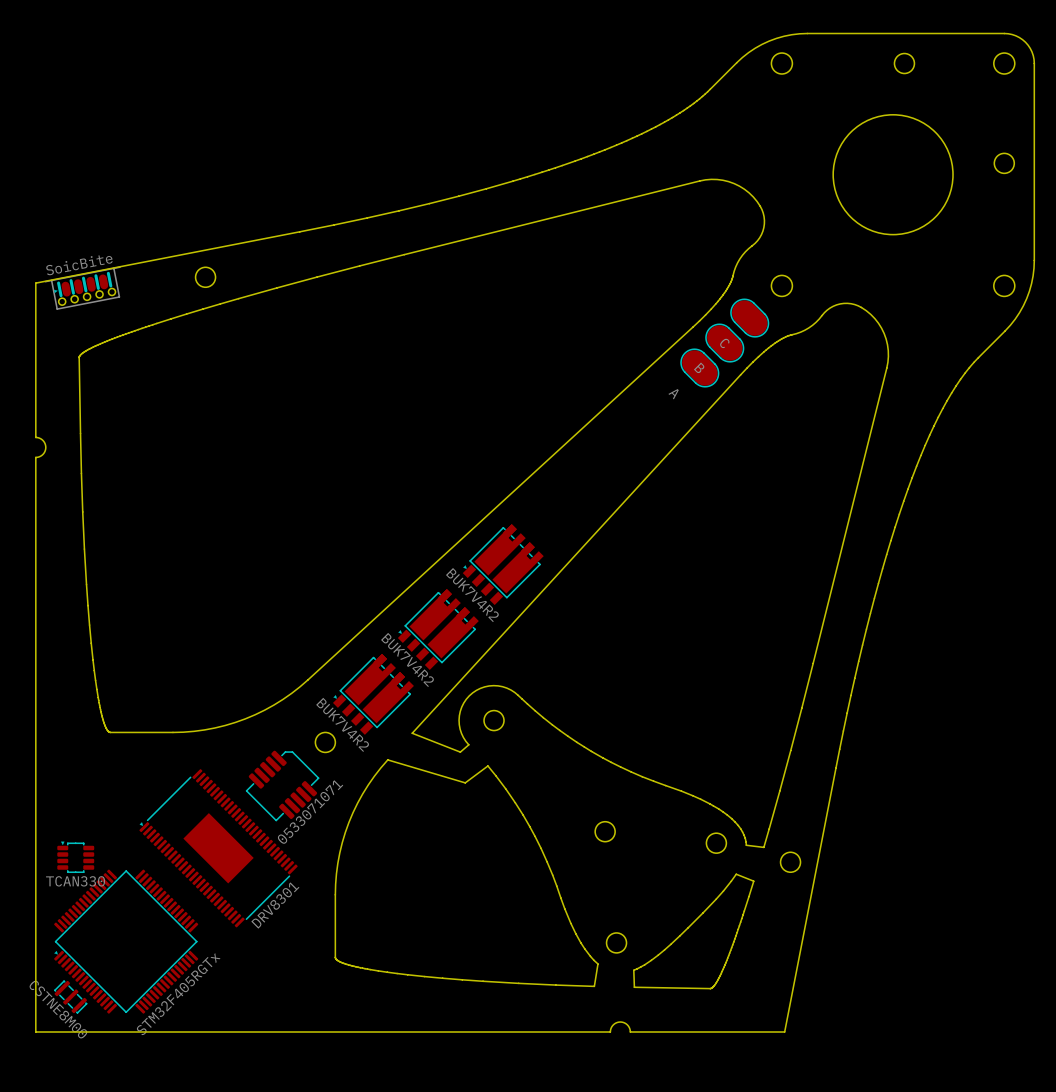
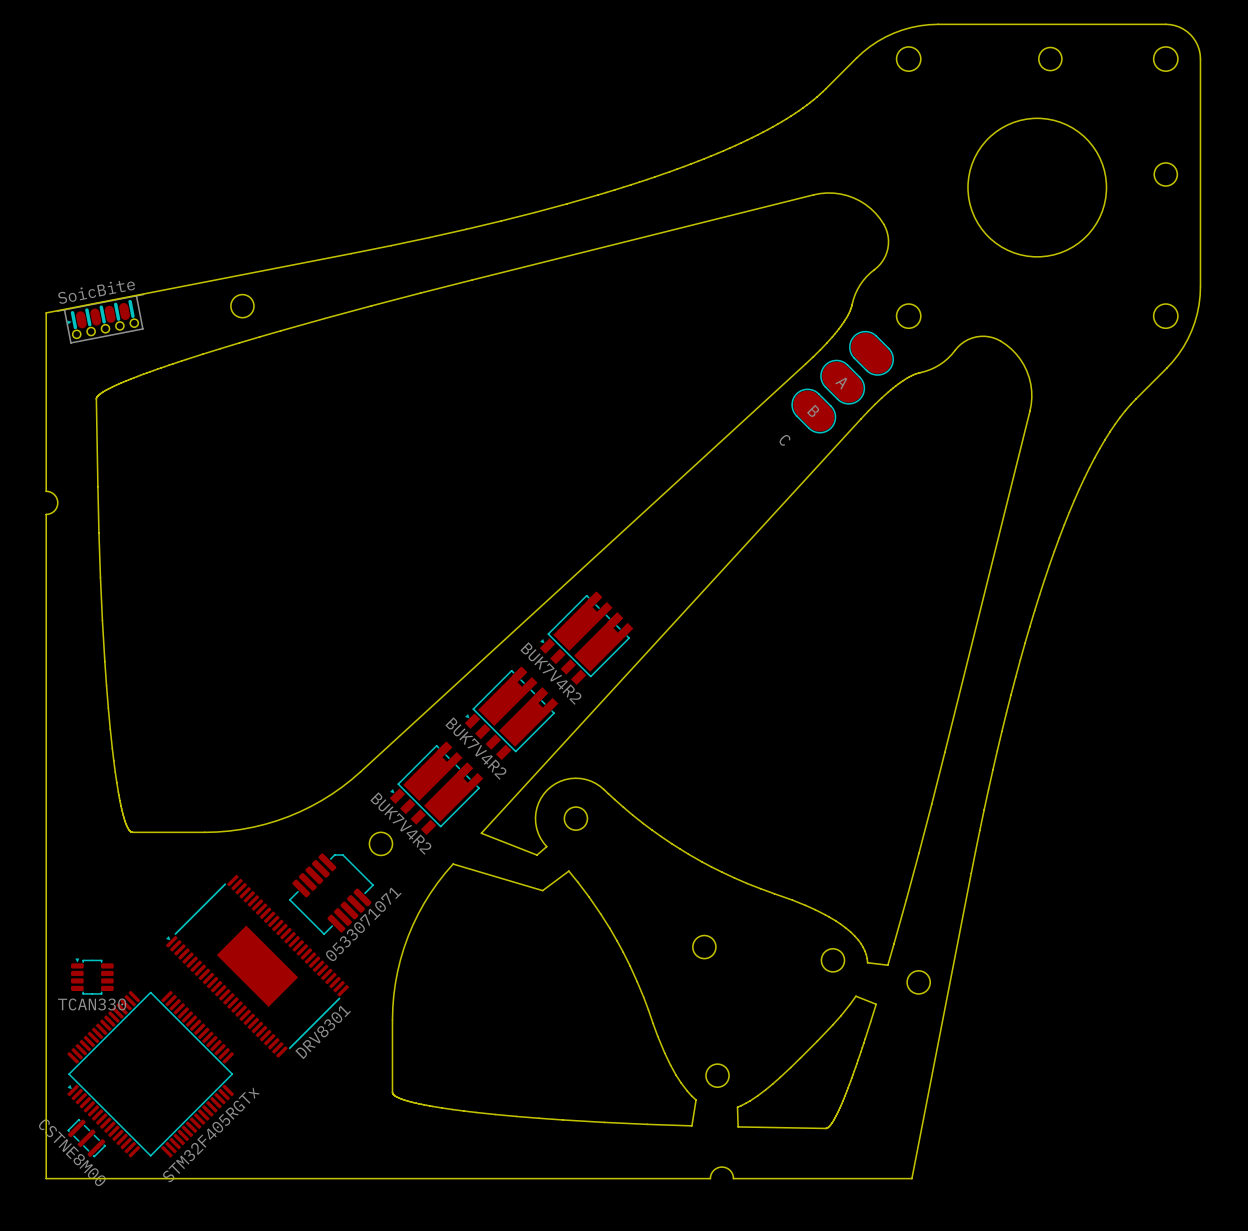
part value: C (724, 343) -> A (841, 383)
part value: A (673, 394) -> C (784, 440)

